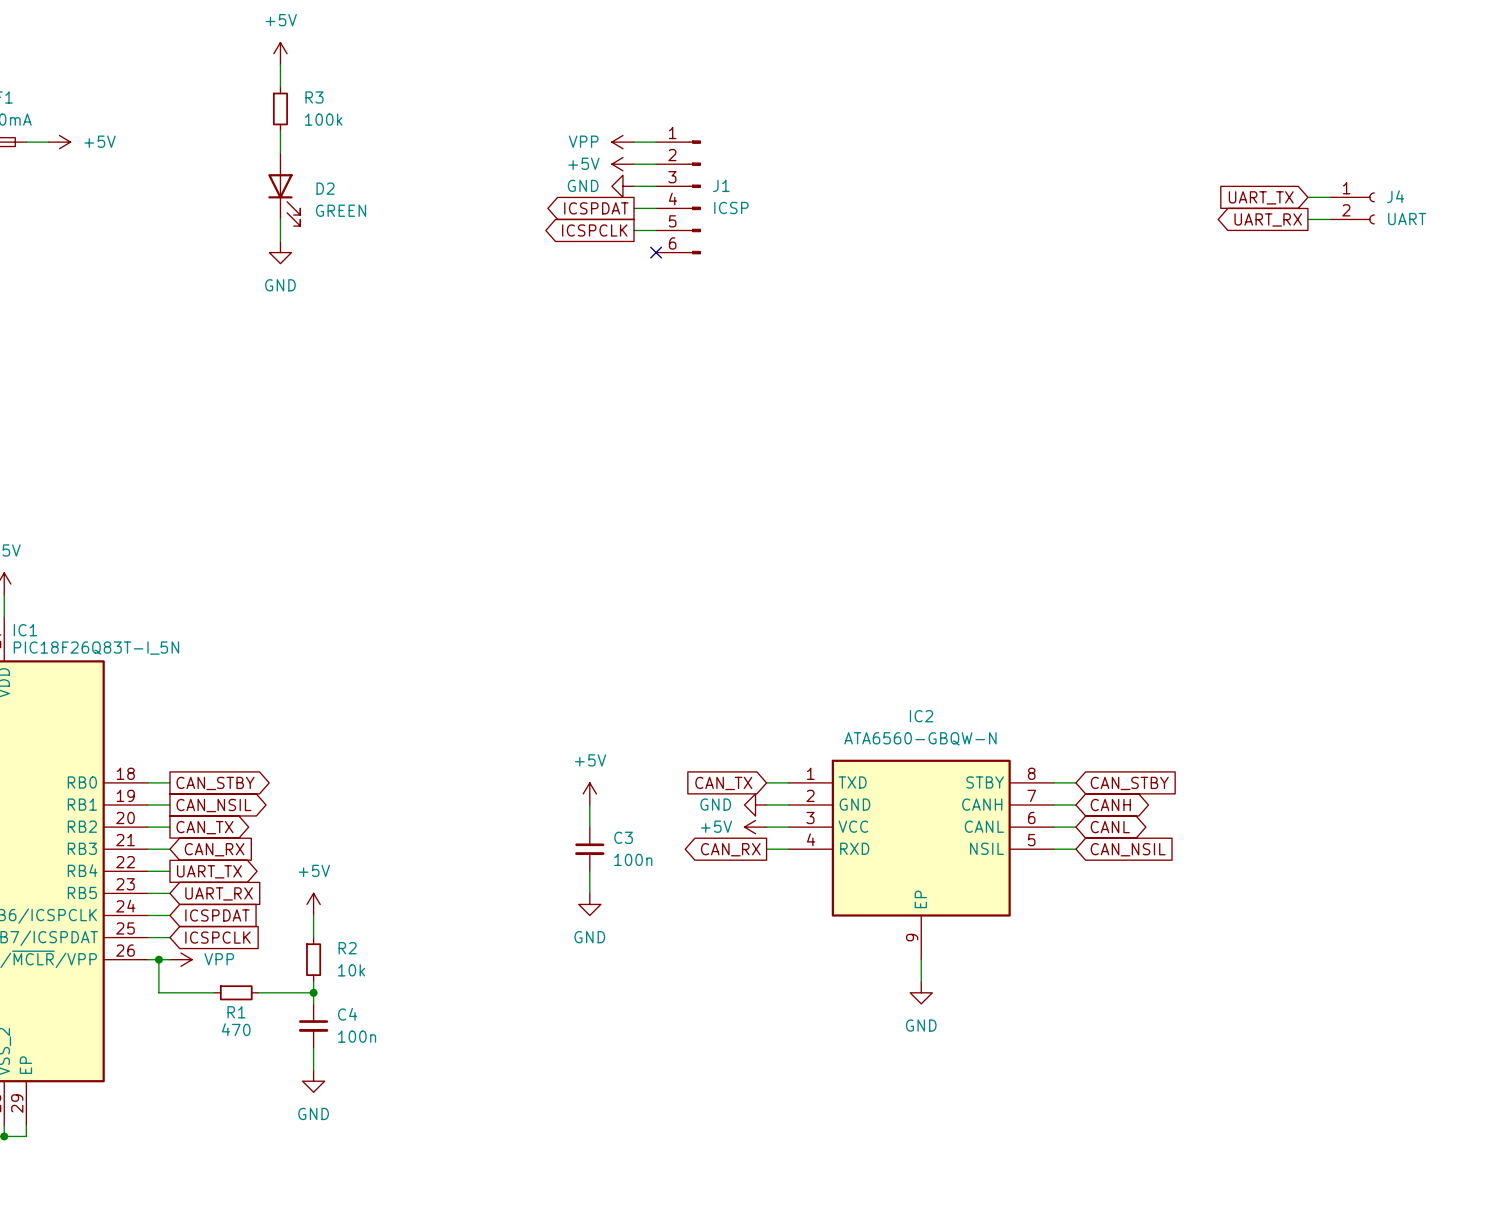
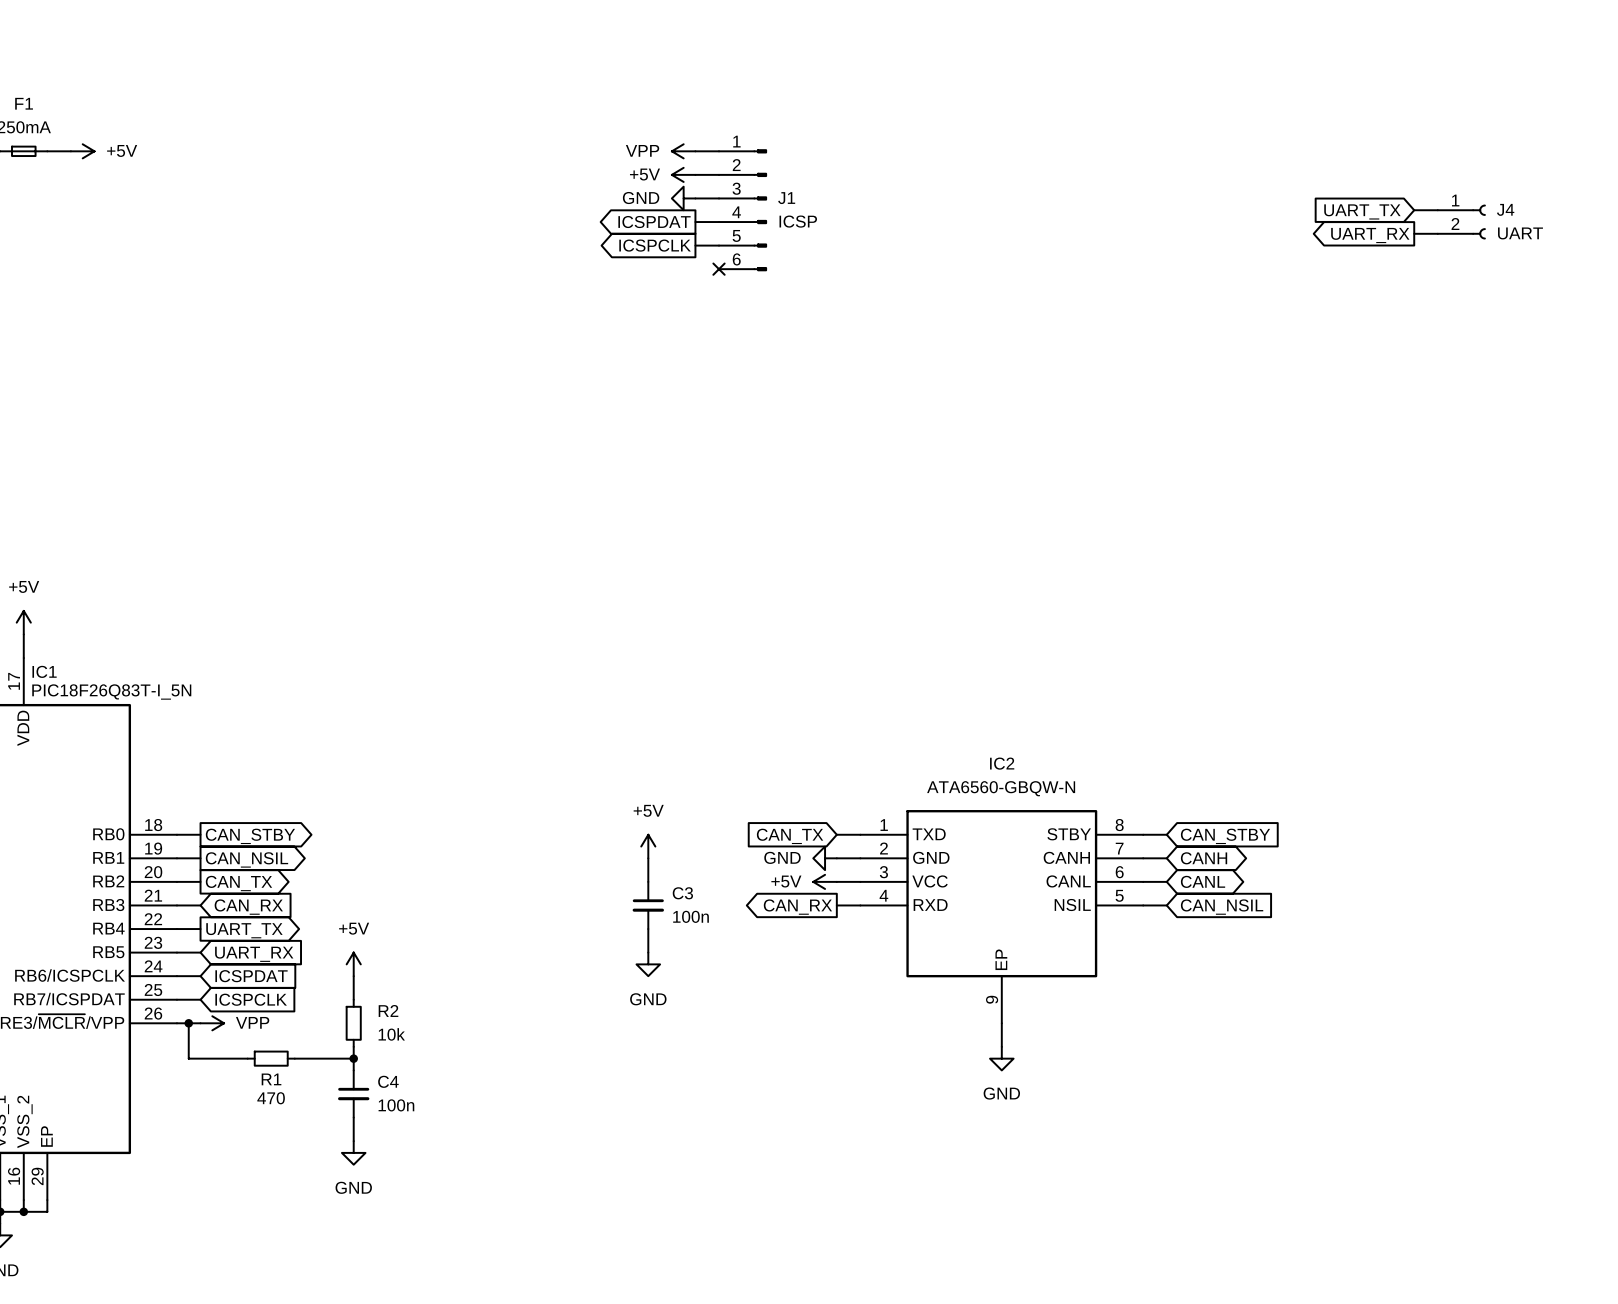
power symbol: +5V (280, 53) -> none
wire: (280, 64) (280, 86) -> none
R3: 100k (280, 108) -> none
wire: (280, 131) (280, 153) -> none
D2: GREEN (284, 189) -> none
wire: (280, 219) (280, 241) -> none
power symbol: GND (280, 252) -> none

